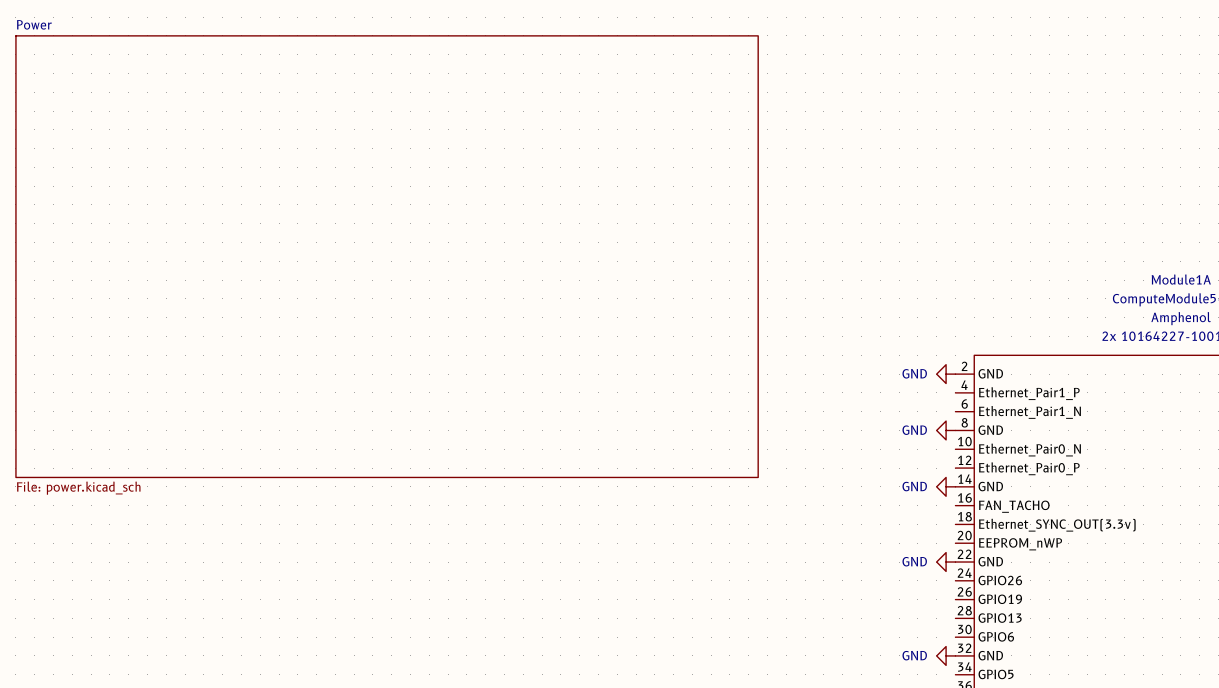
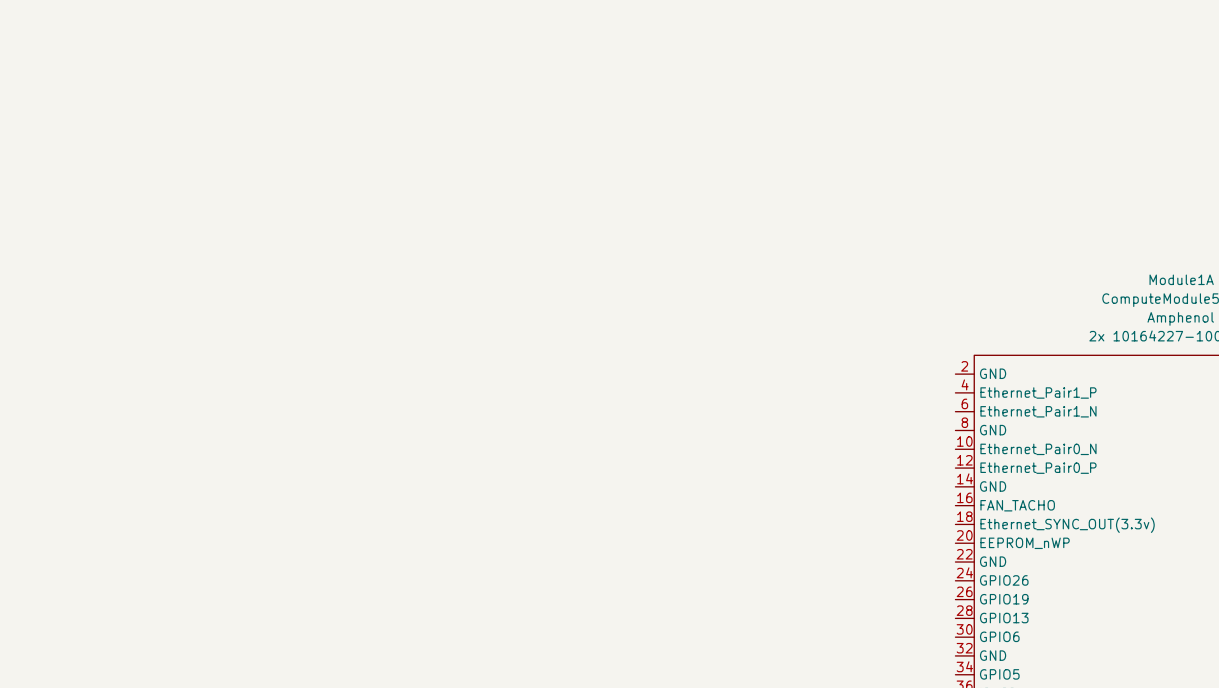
sheet Power: File: power.kicad_sch (387, 256) -> none
power symbol: GND (946, 374) -> none
power symbol: GND (946, 430) -> none
power symbol: GND (946, 486) -> none
power symbol: GND (946, 562) -> none
power symbol: GND (946, 655) -> none

